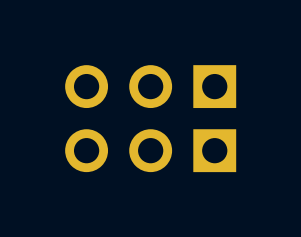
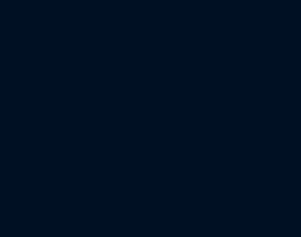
part: (150, 86) -> none
part: (150, 150) -> none

